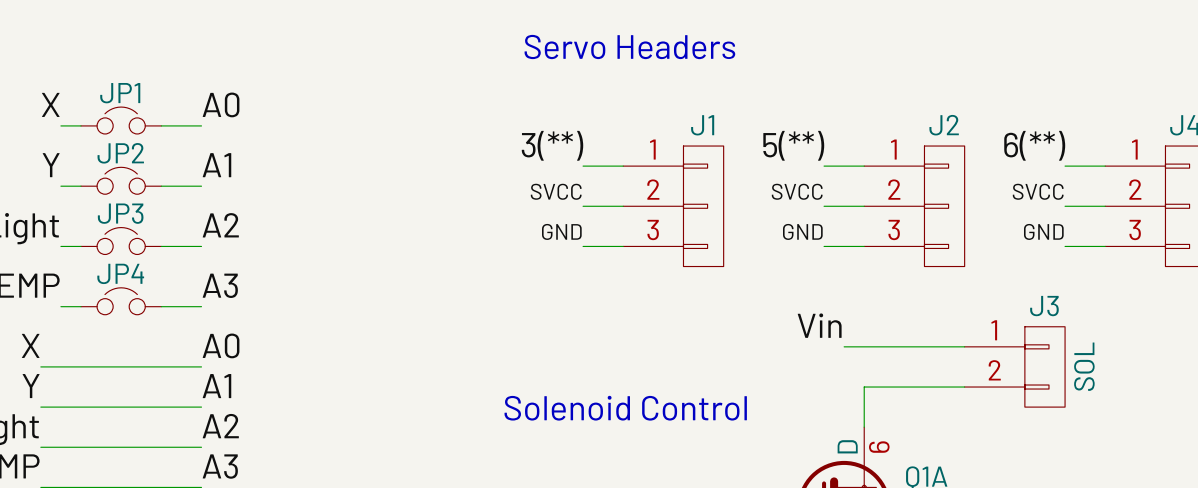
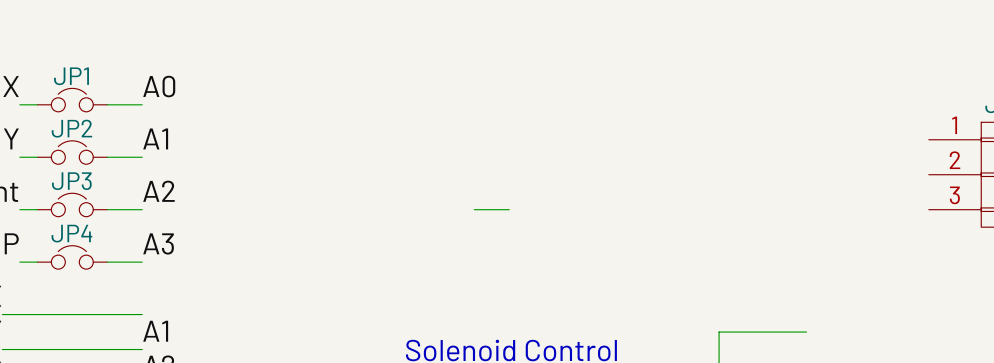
text: Servo Headers (629, 47) -> none
label: 3(**) (552, 145) -> none
label: 5(**) (793, 145) -> none
label: 6(**) (1034, 145) -> none
wire: (583, 166) (623, 166) -> none
wire: (824, 166) (864, 166) -> none
wire: (1065, 166) (1105, 166) -> none
label: SVCC (556, 191) -> none
label: SVCC (797, 191) -> none
label: SVCC (1038, 191) -> none
wire: (583, 206) (623, 206) -> none
J1: (673, 206) -> none
wire: (824, 206) (864, 206) -> none
J2: (914, 206) -> none
wire: (1065, 206) (1105, 206) -> none
label: GND (561, 231) -> none
label: GND (802, 231) -> none
label: GND (1043, 231) -> none
wire: (824, 246) (864, 246) -> none
wire: (1065, 246) (1105, 246) -> none
label: Vin (819, 325) -> none
label: A0 (221, 345) -> none
wire: (844, 346) (964, 346) -> none
J3: SOL (1014, 366) -> none

